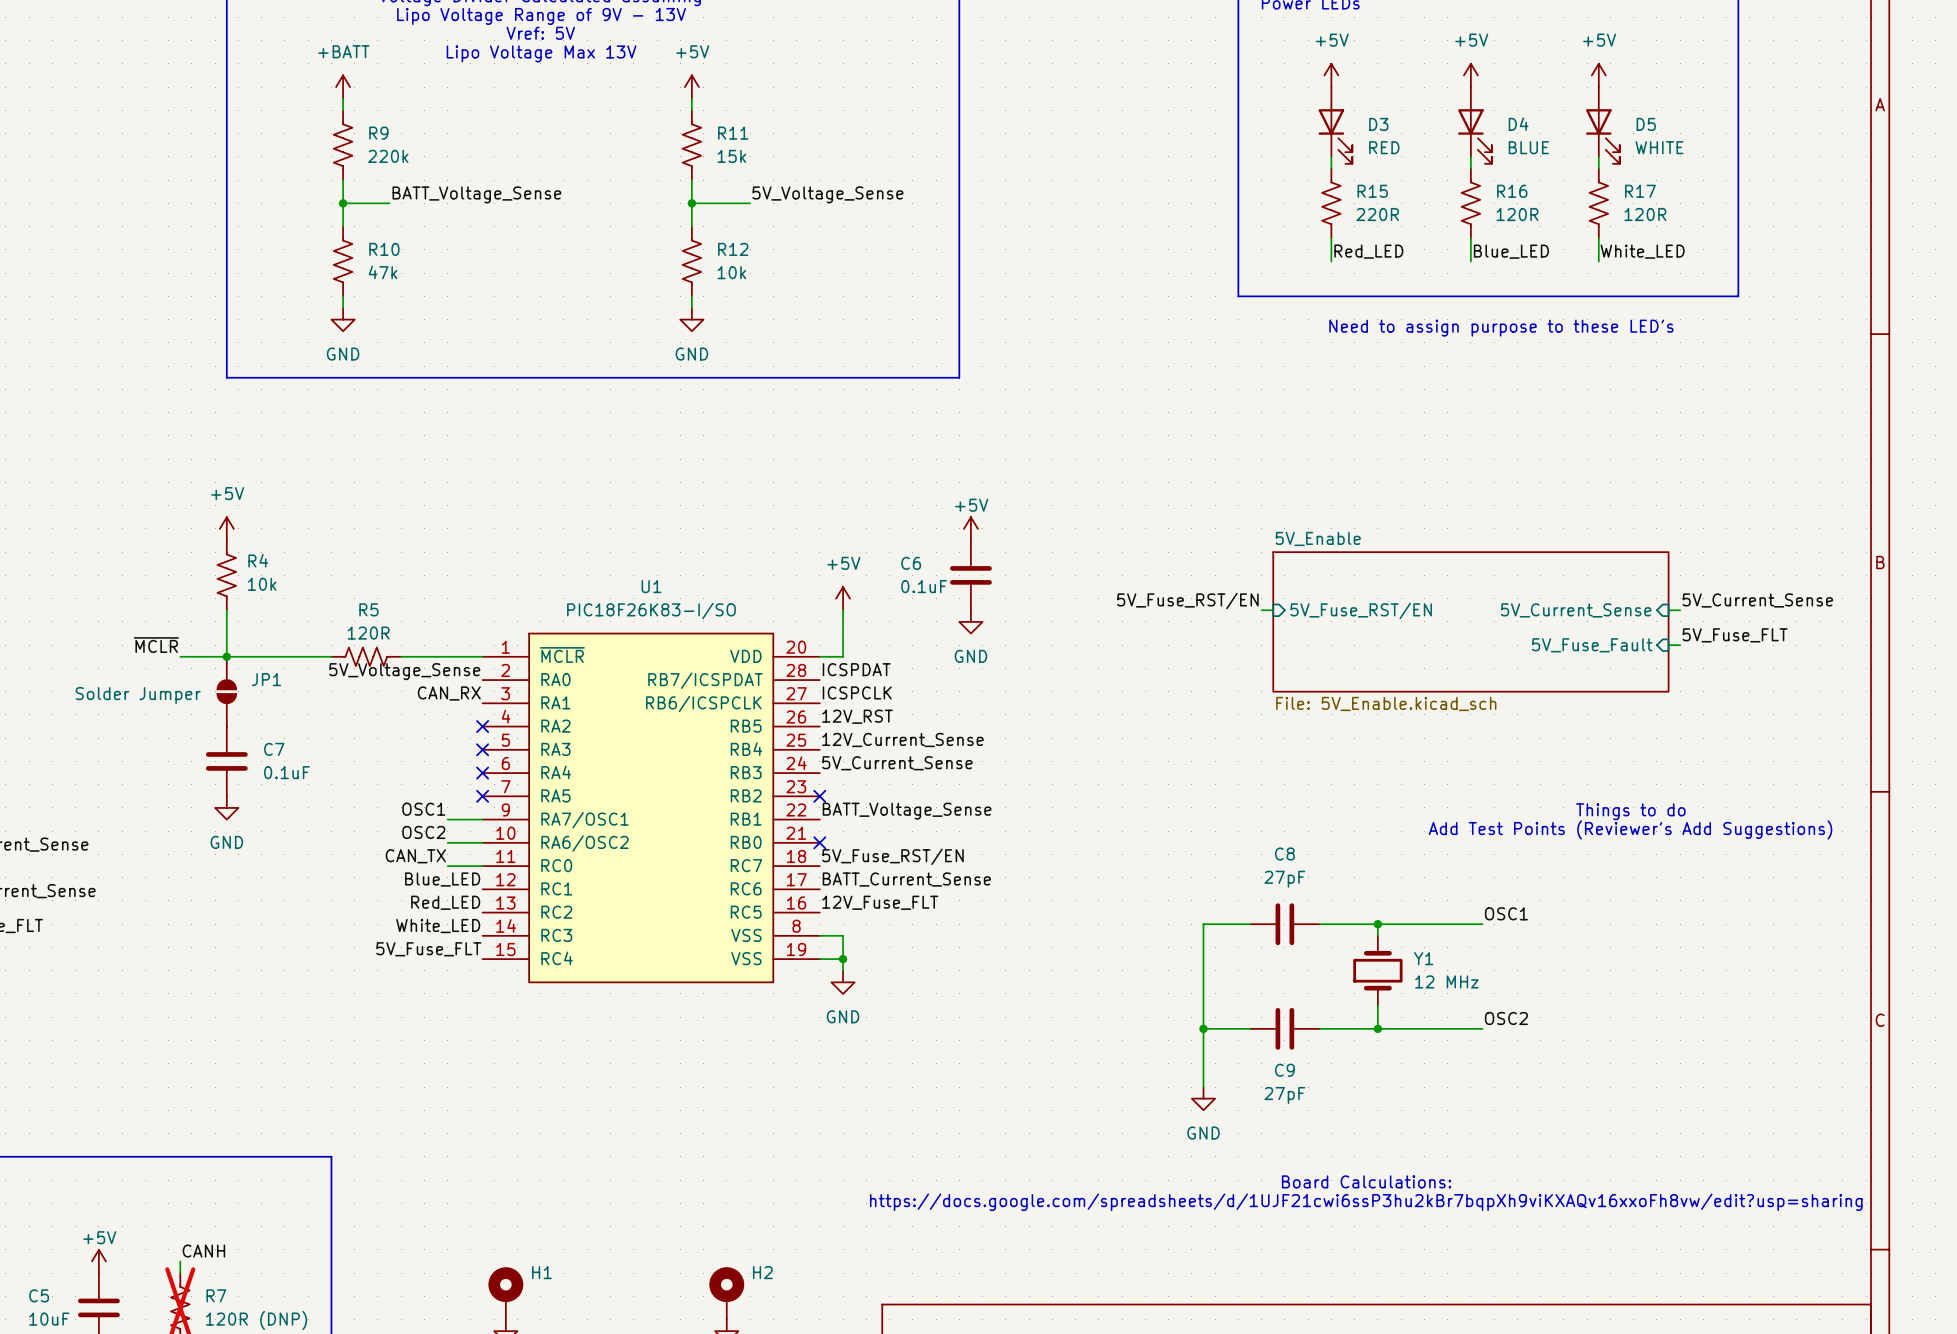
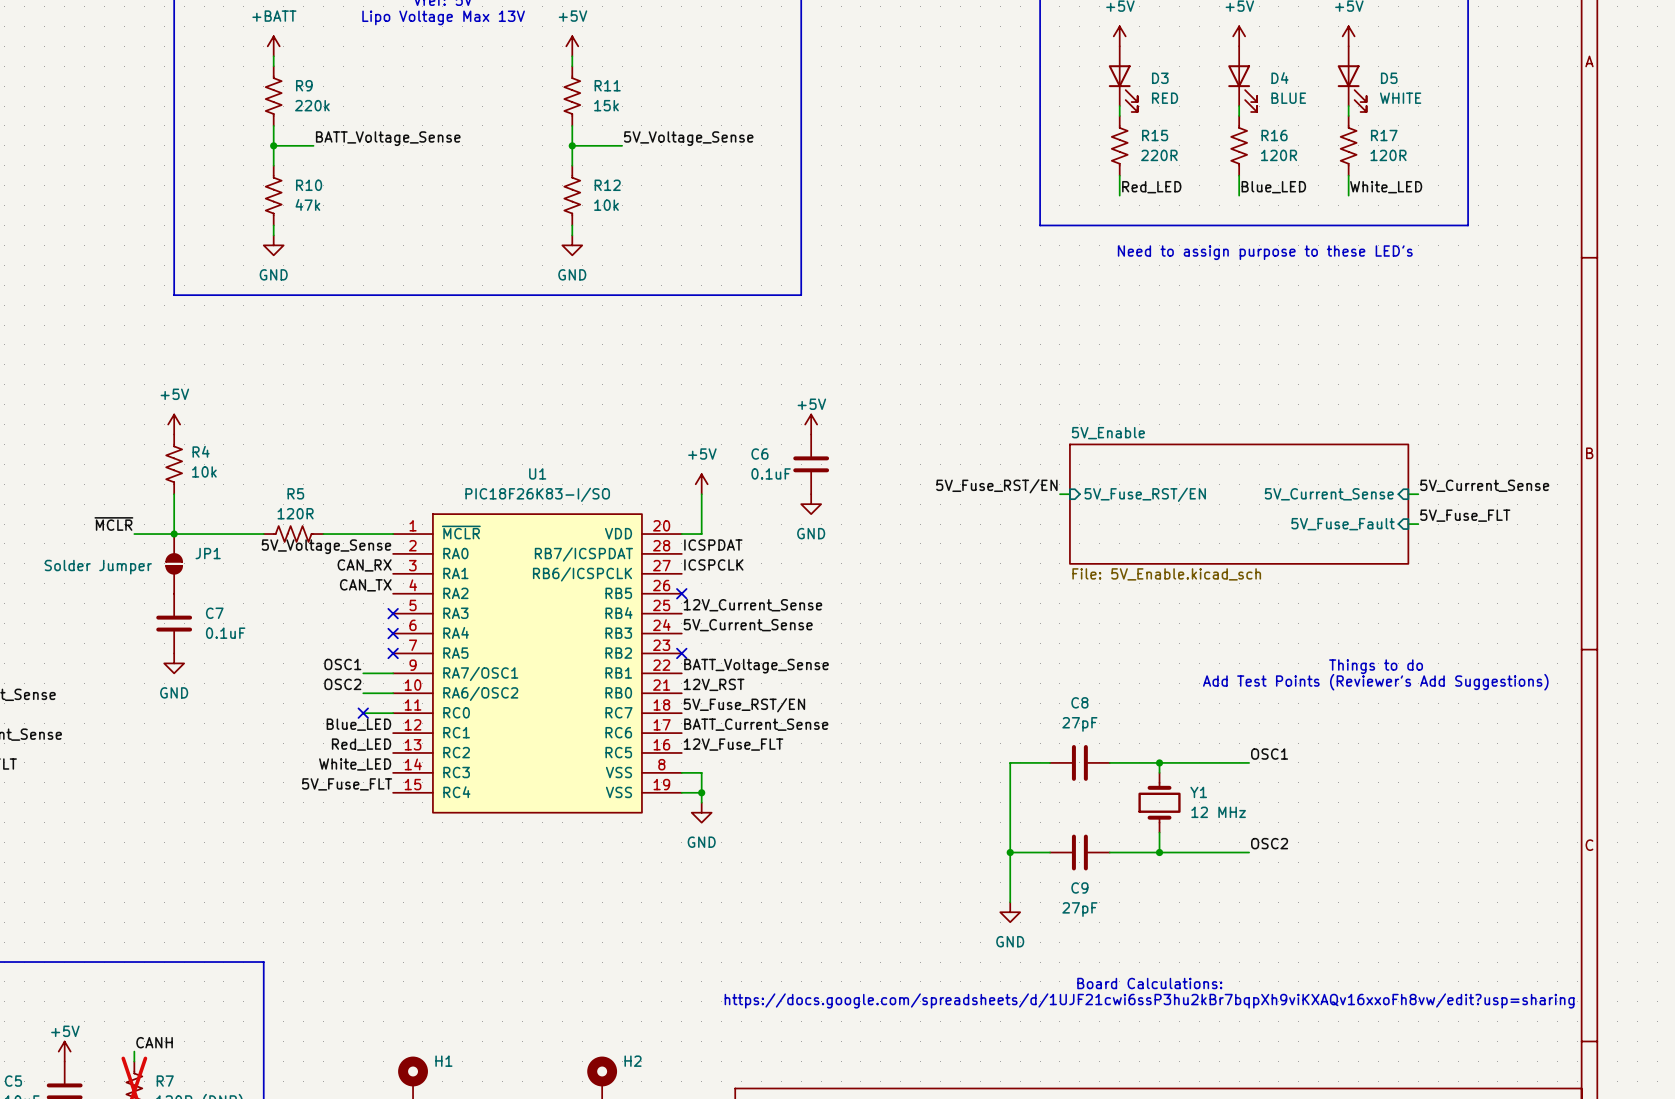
label position: 12V_RST (857, 716) -> 12V_RST (714, 684)
no-connect mark: (482, 726) -> none
no-connect mark: none -> (681, 593)
no-connect mark: (819, 842) -> none
label position: CAN_TX (415, 856) -> CAN_TX (365, 585)
no-connect mark: none -> (363, 713)

